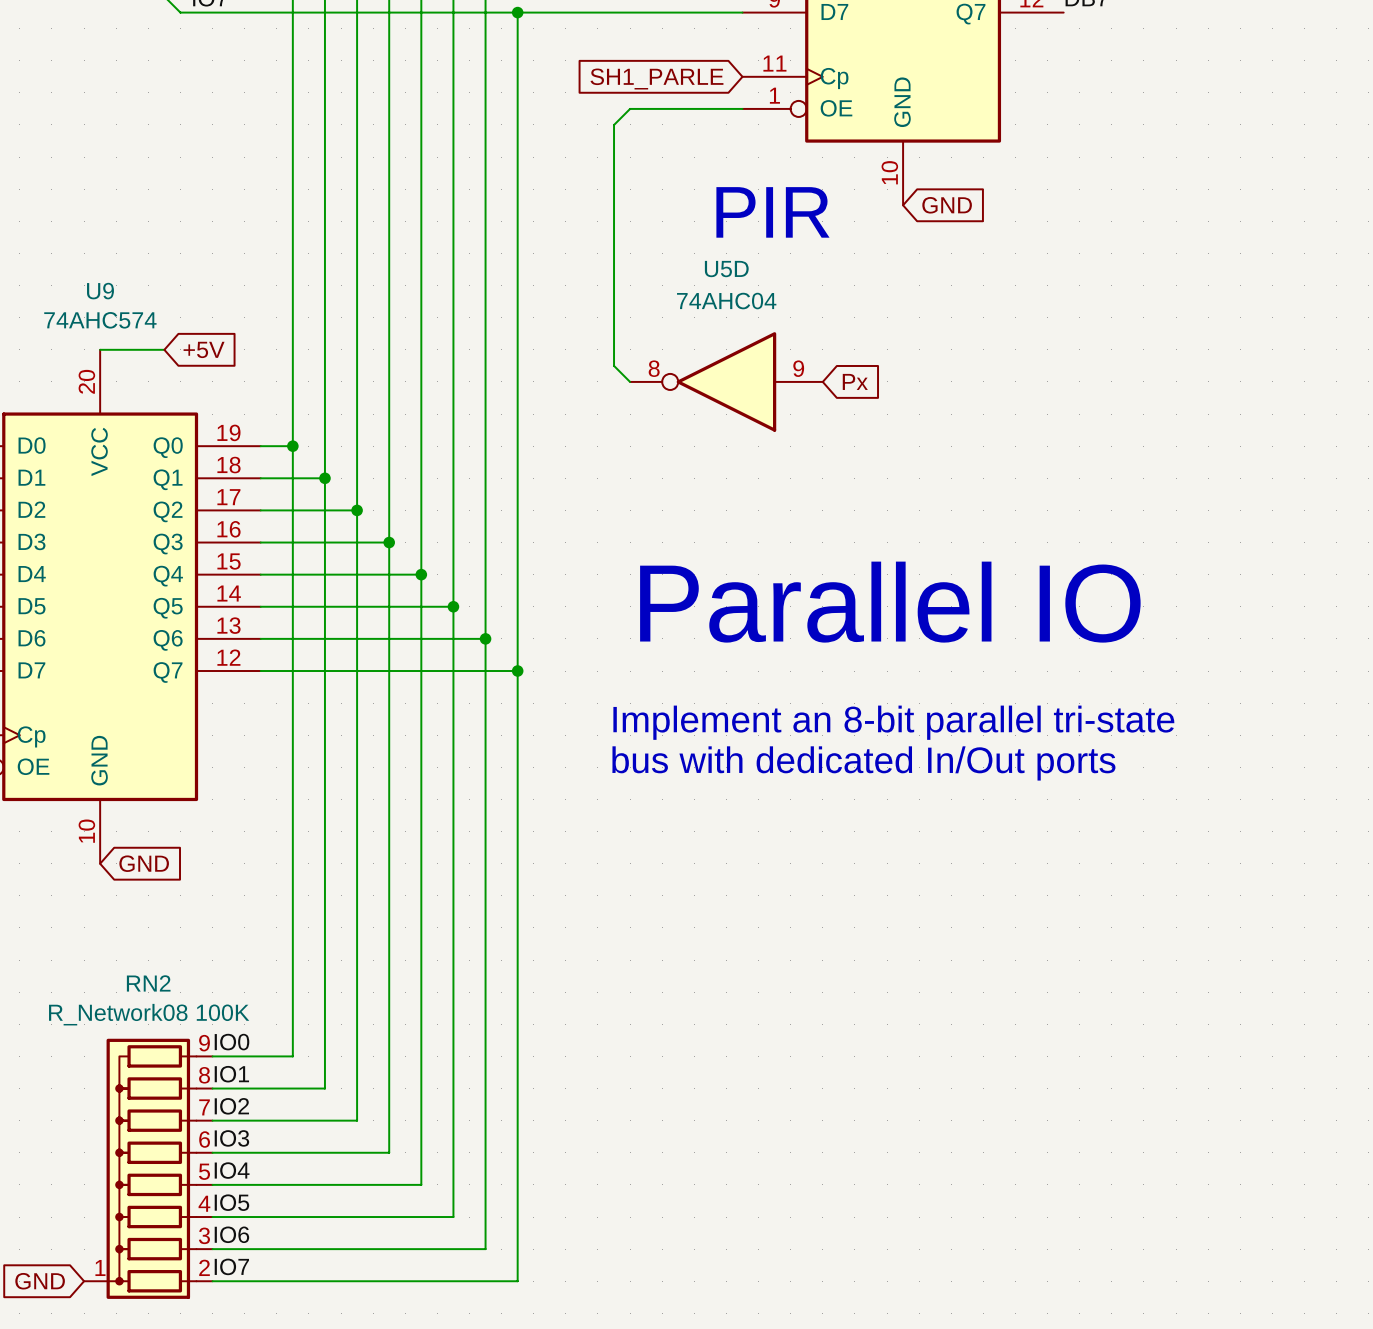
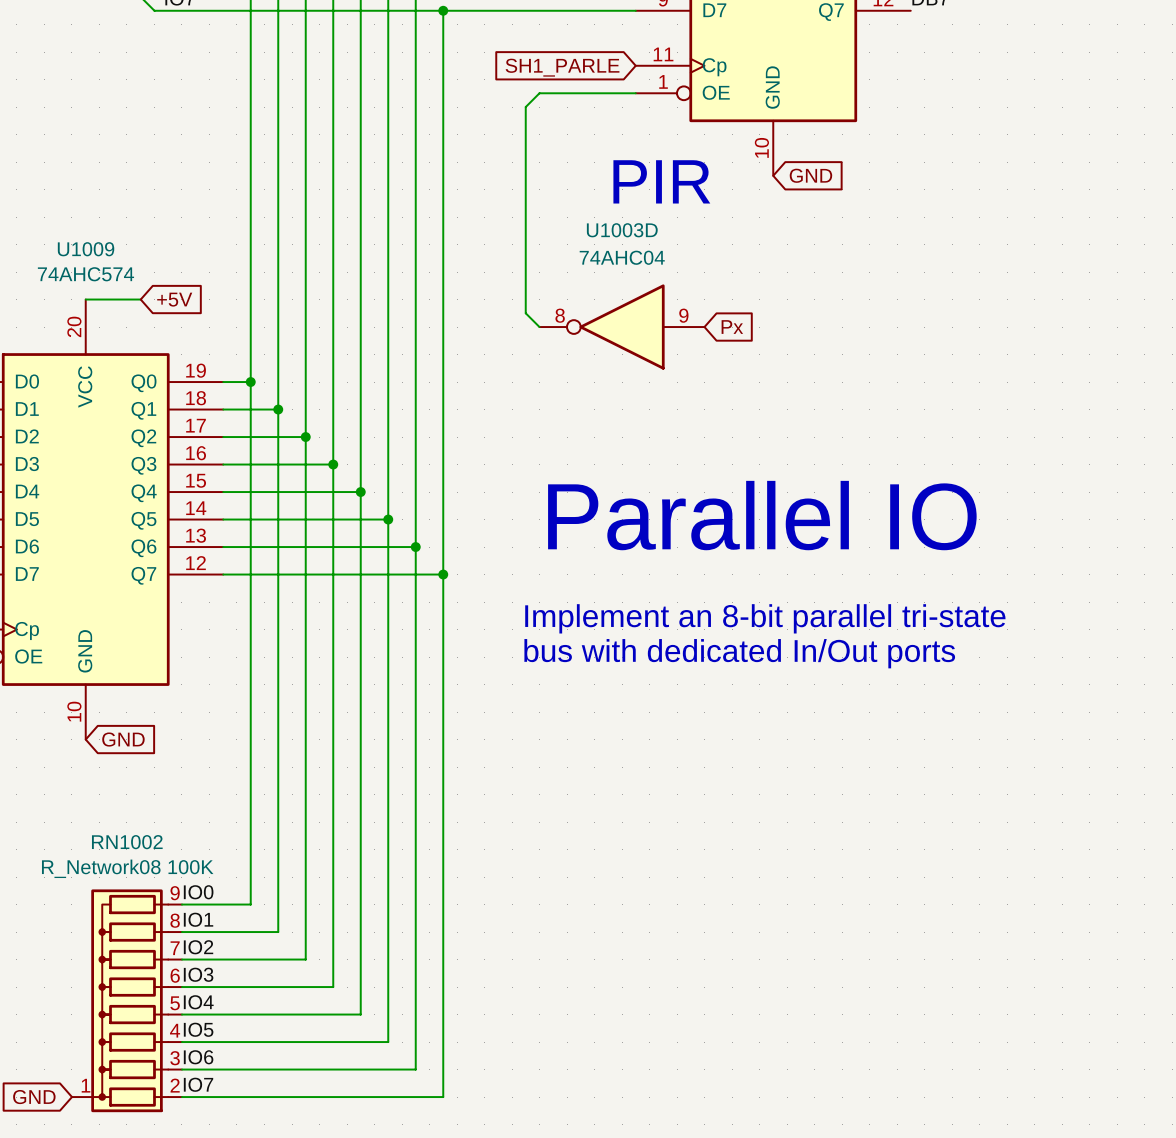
U5D name: U5D (726, 269) -> U1003D (622, 230)
U9 name: U9 (100, 291) -> U1009 (86, 249)
RN2 name: RN2 (148, 983) -> RN1002 (127, 842)

